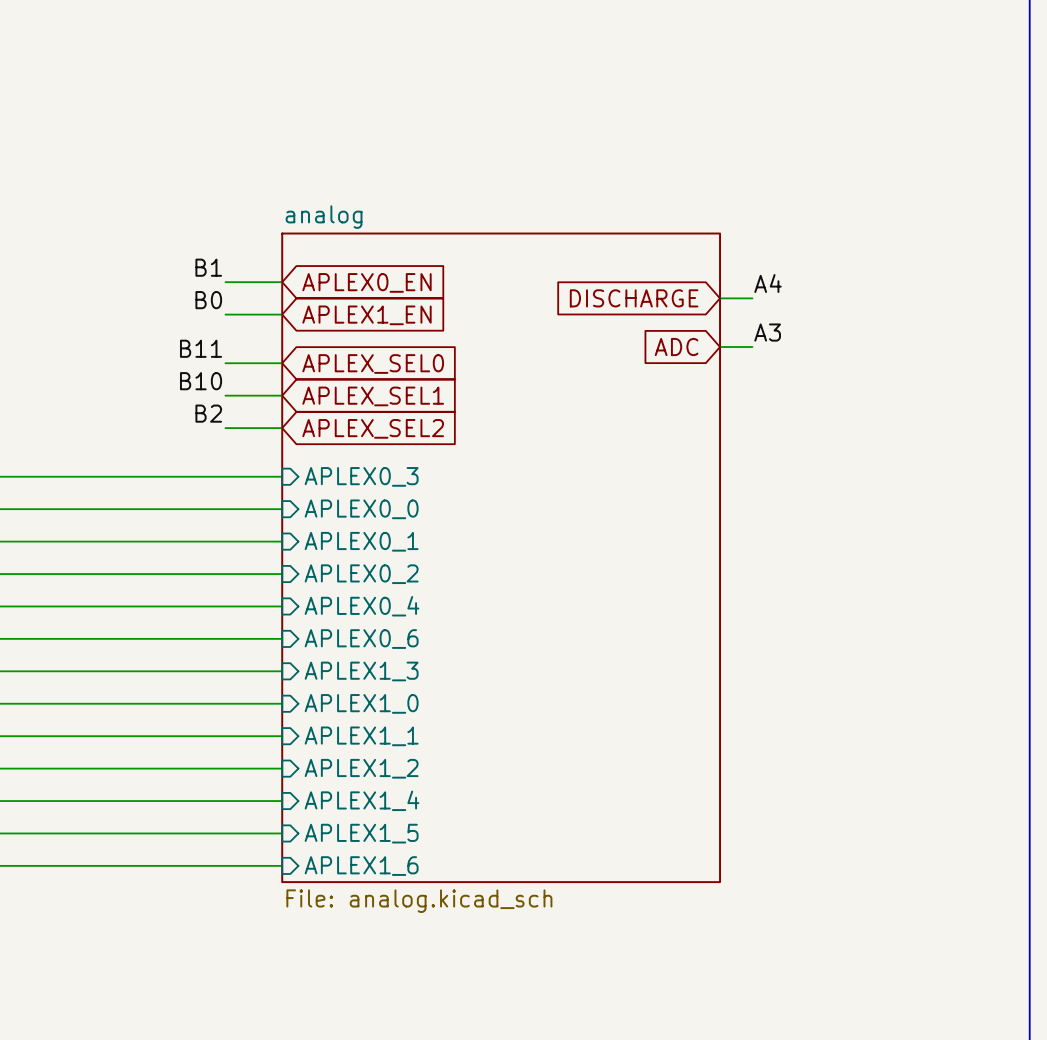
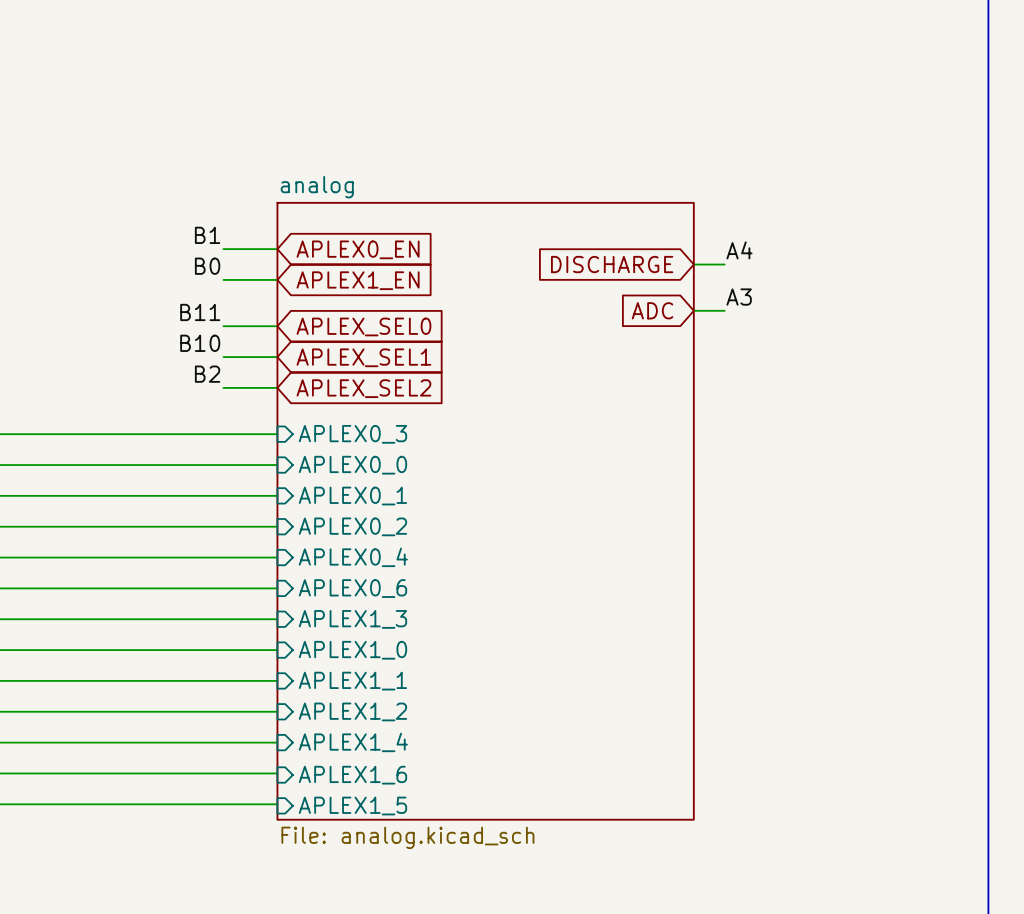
sheet pin: APLEX1_5 (361, 833) -> APLEX1_6 (352, 775)
sheet pin: APLEX1_6 (361, 866) -> APLEX1_5 (352, 806)

